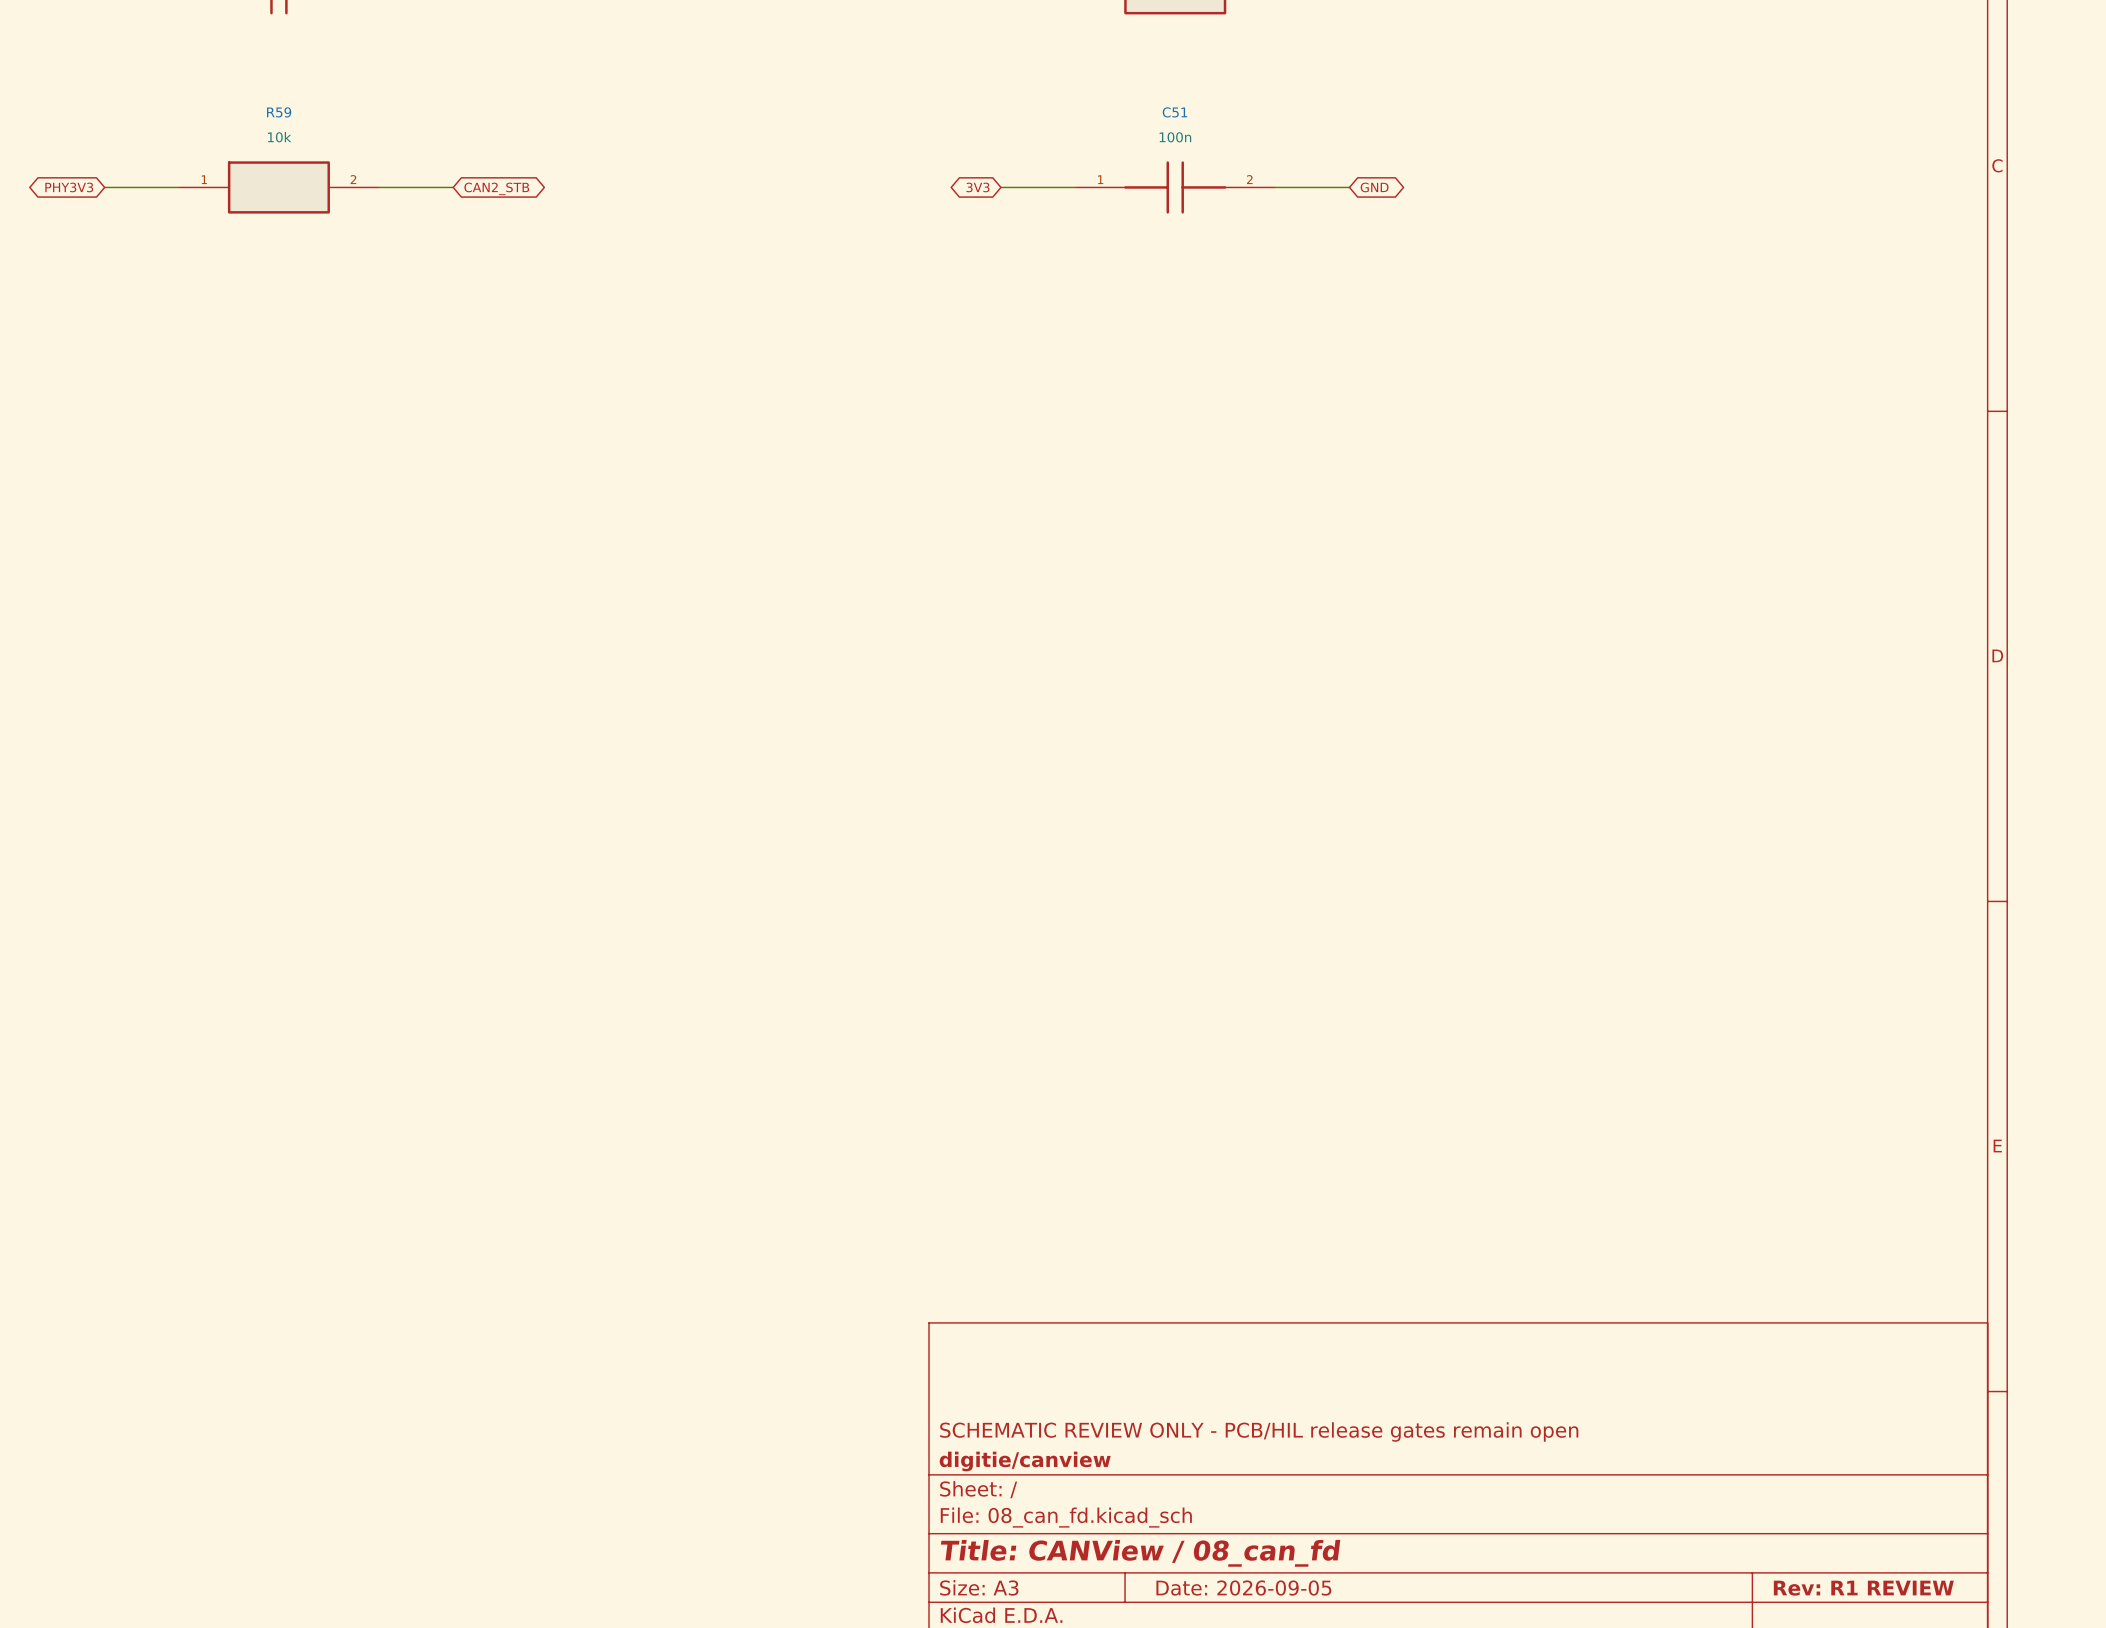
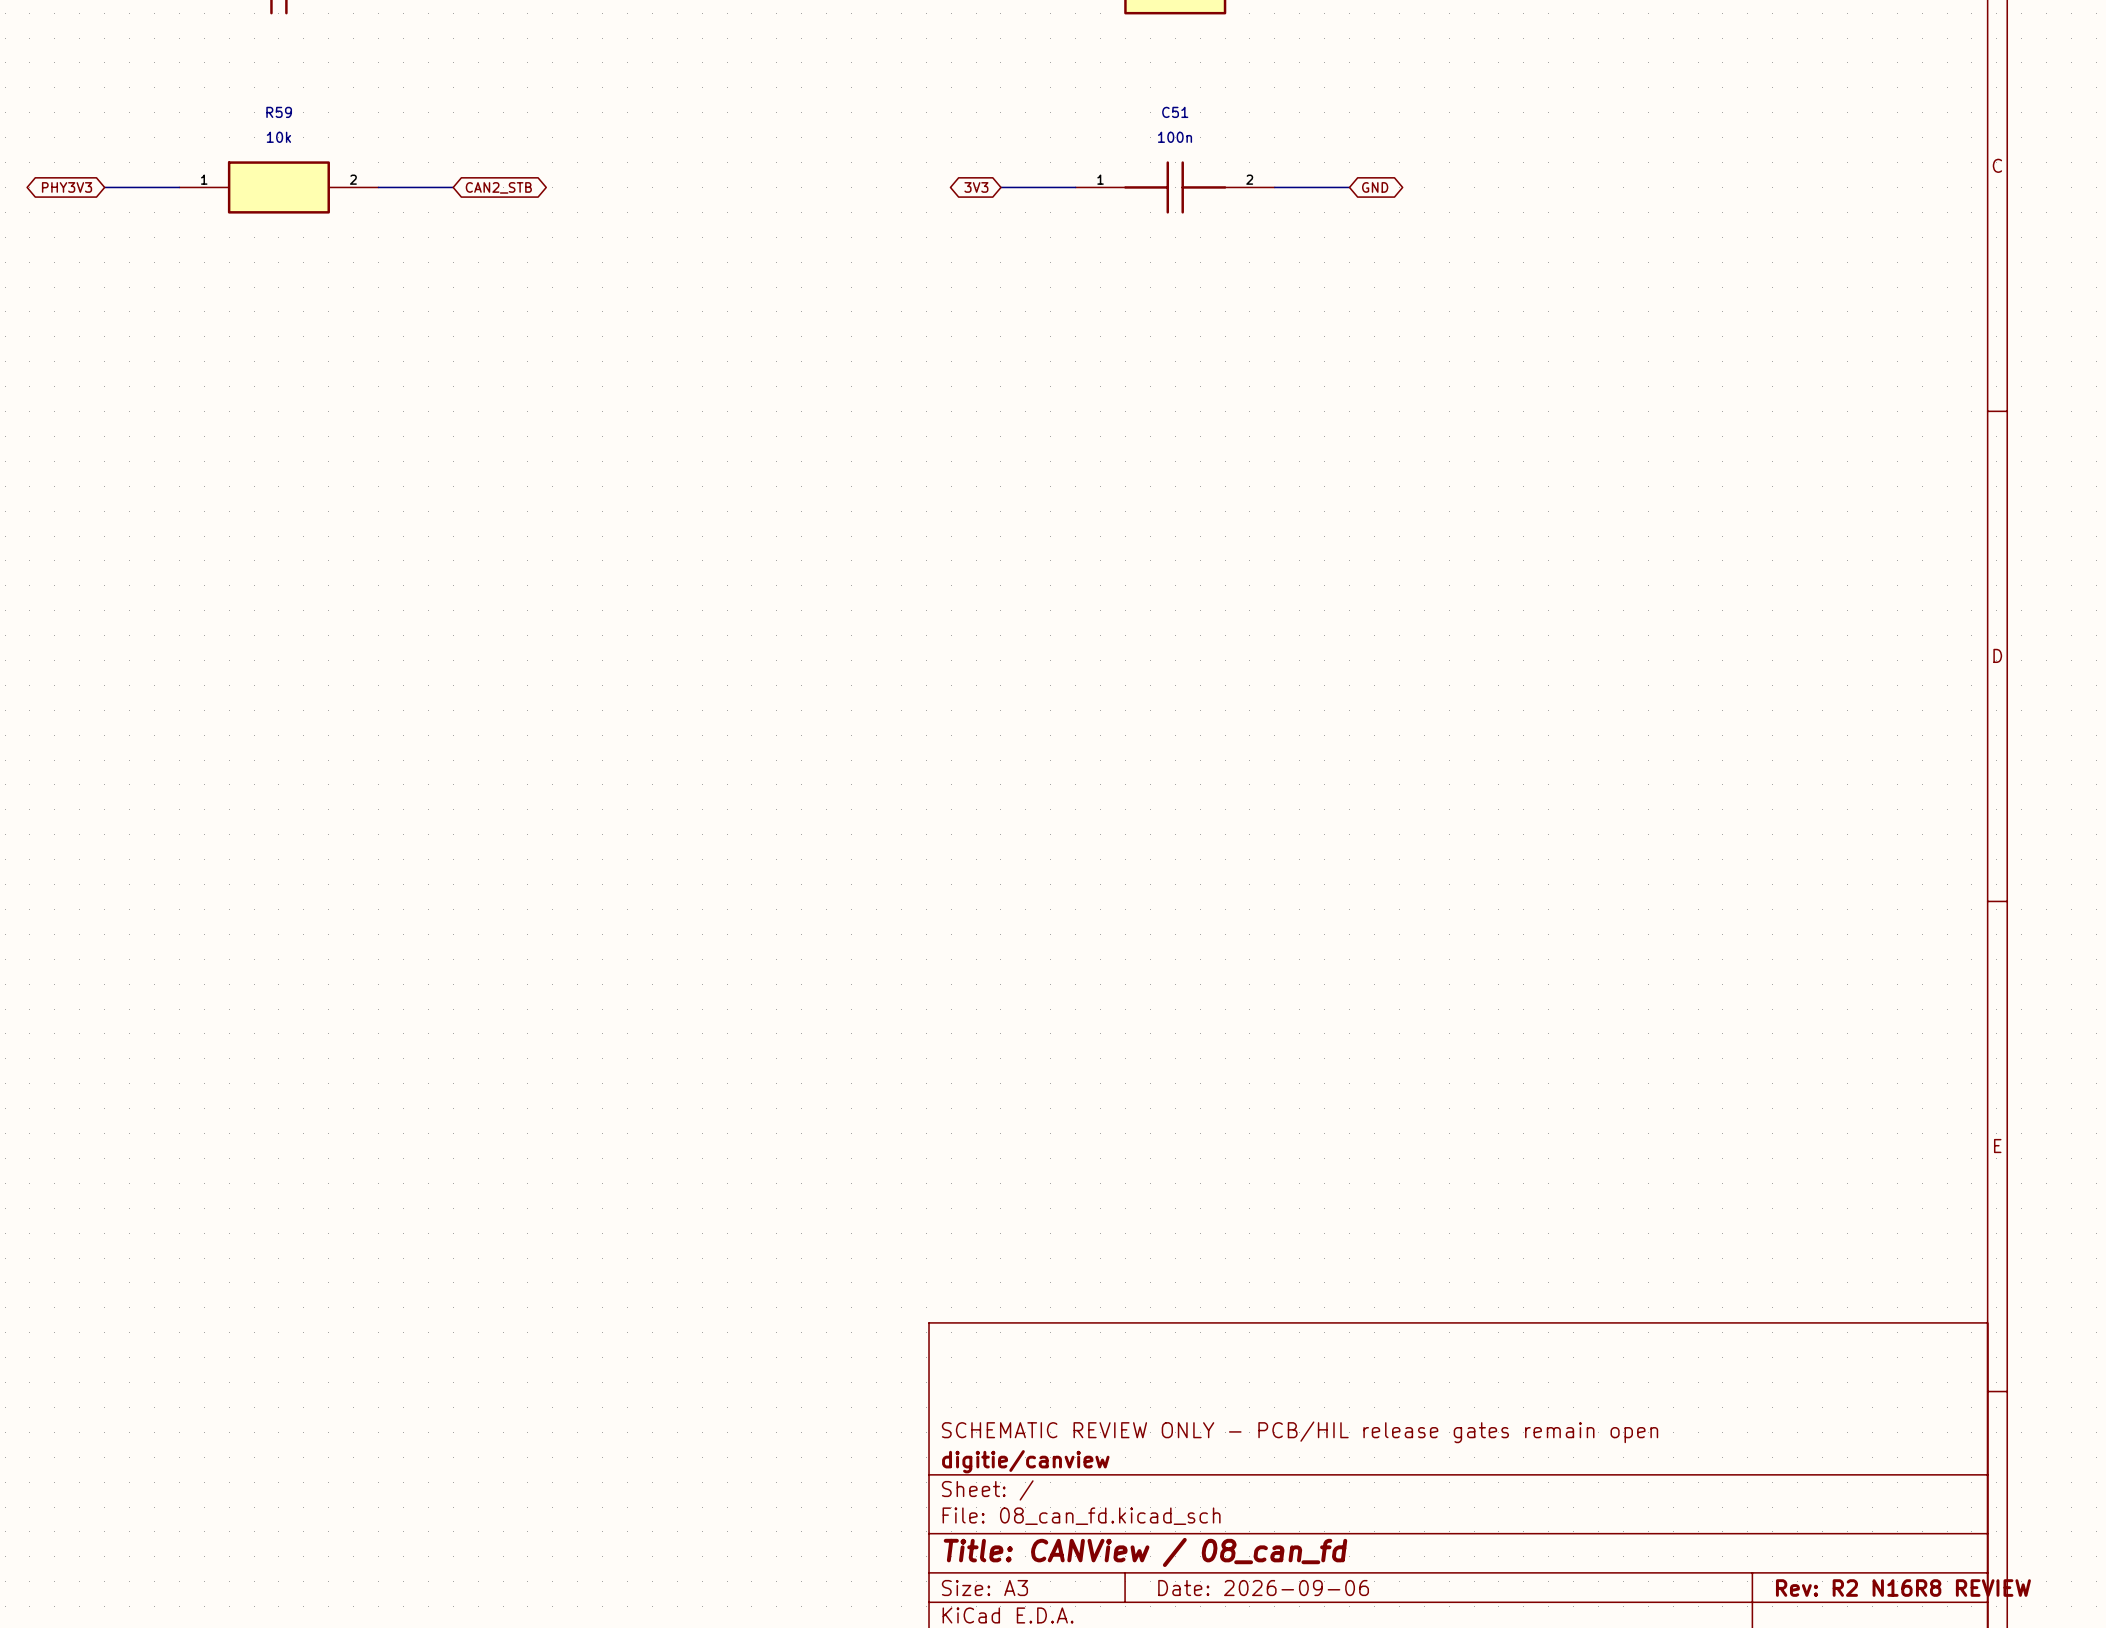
title block: Date: 2026-09-05 (1243, 1588) -> Date: 2026-09-06 (1263, 1588)
title block: Rev: R1 REVIEW (1863, 1588) -> Rev: R2 N16R8 REVIEW (1903, 1588)

